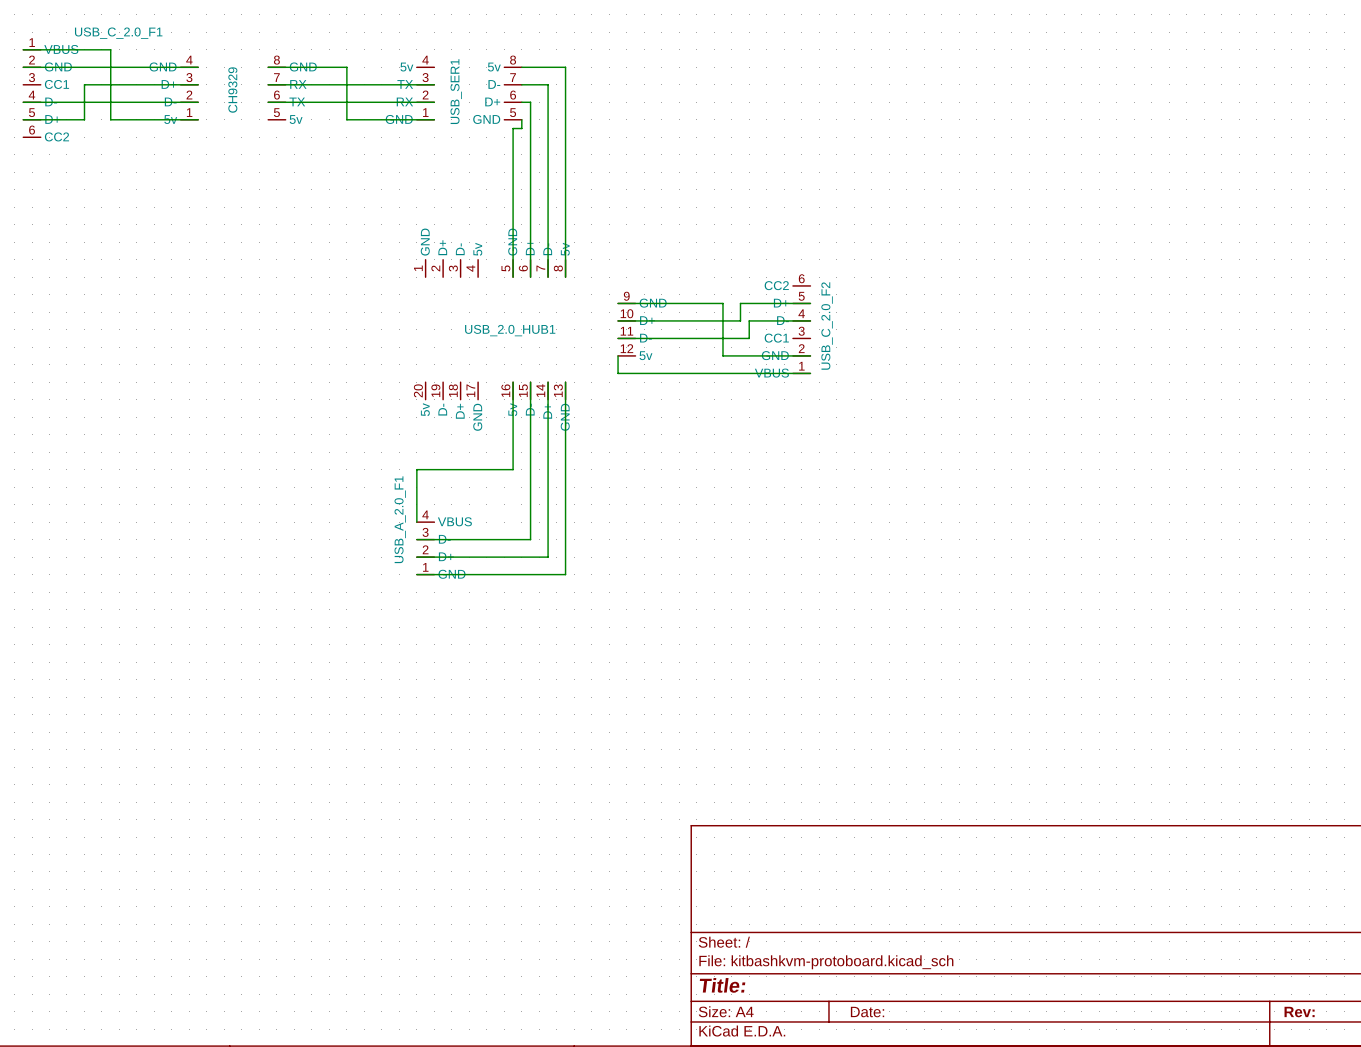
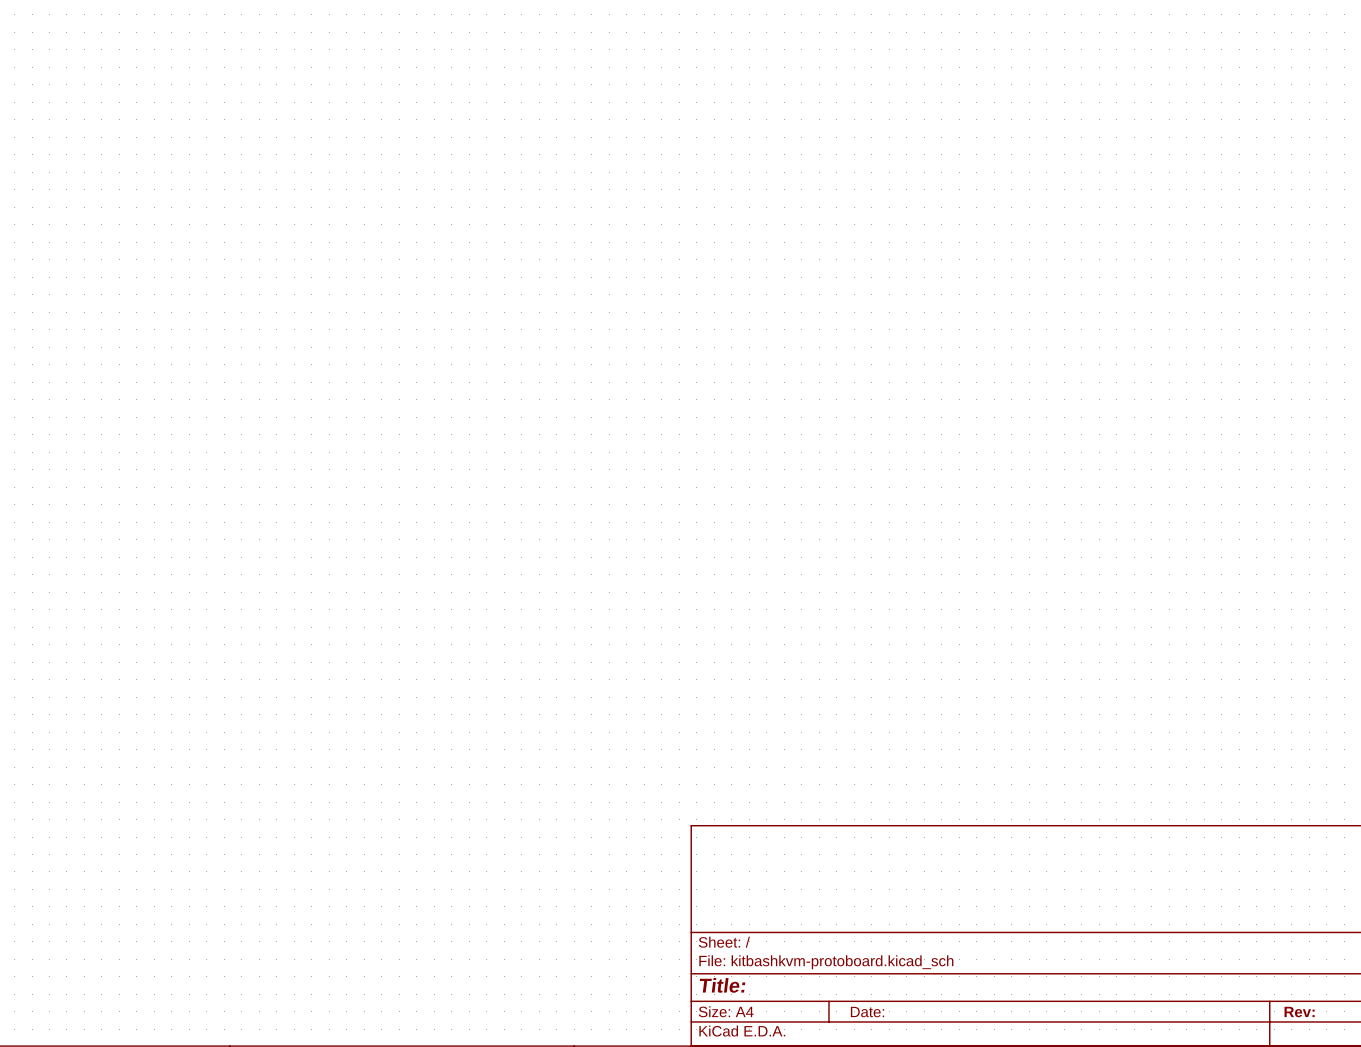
wire: (23, 49) (110, 49) (110, 119) (198, 119) -> none
wire: (23, 67) (198, 67) -> none
wire: (268, 67) (346, 67) (346, 119) (434, 119) -> none
wire: (521, 67) (565, 67) (565, 277) -> none
wire: (198, 84) (84, 84) (84, 119) (23, 119) -> none
wire: (268, 84) (434, 84) -> none
wire: (521, 84) (548, 84) (548, 277) -> none
USB_C_2.0_F1: (32, 93) -> none
CH9329: (233, 93) -> none
USB_SER1: (469, 93) -> none
wire: (23, 102) (198, 102) -> none
wire: (268, 102) (434, 102) -> none
wire: (521, 102) (530, 102) (530, 277) -> none
wire: (521, 119) (521, 128) (513, 128) (513, 277) -> none
wire: (618, 303) (722, 303) (722, 355) (810, 355) -> none
wire: (810, 303) (740, 303) (740, 320) (618, 320) -> none
wire: (810, 320) (749, 320) (749, 338) (618, 338) -> none
USB_2.0_HUB1: (530, 329) -> none
USB_C_2.0_F2: (801, 329) -> none
wire: (618, 355) (618, 373) (810, 373) -> none
wire: (513, 382) (513, 469) (416, 469) (416, 522) -> none
wire: (530, 382) (530, 539) (416, 539) -> none
wire: (548, 382) (548, 557) (416, 557) -> none
wire: (565, 382) (565, 574) (416, 574) -> none
USB_A_2.0_F1: (425, 548) -> none

